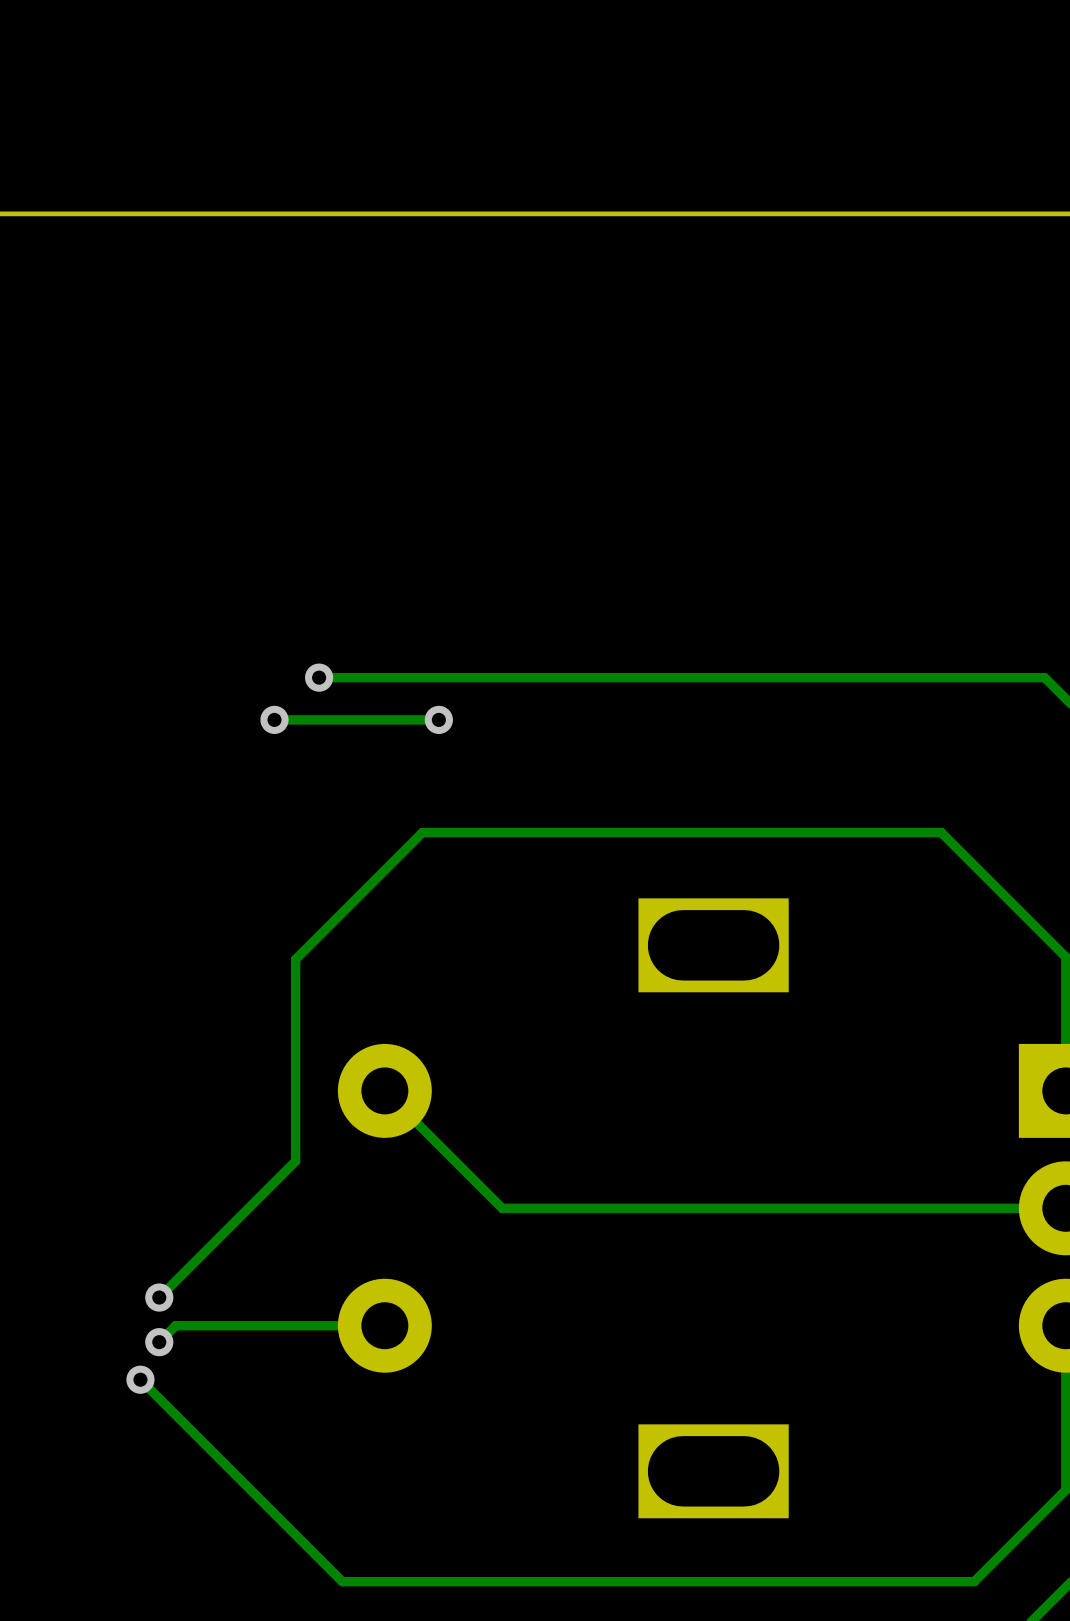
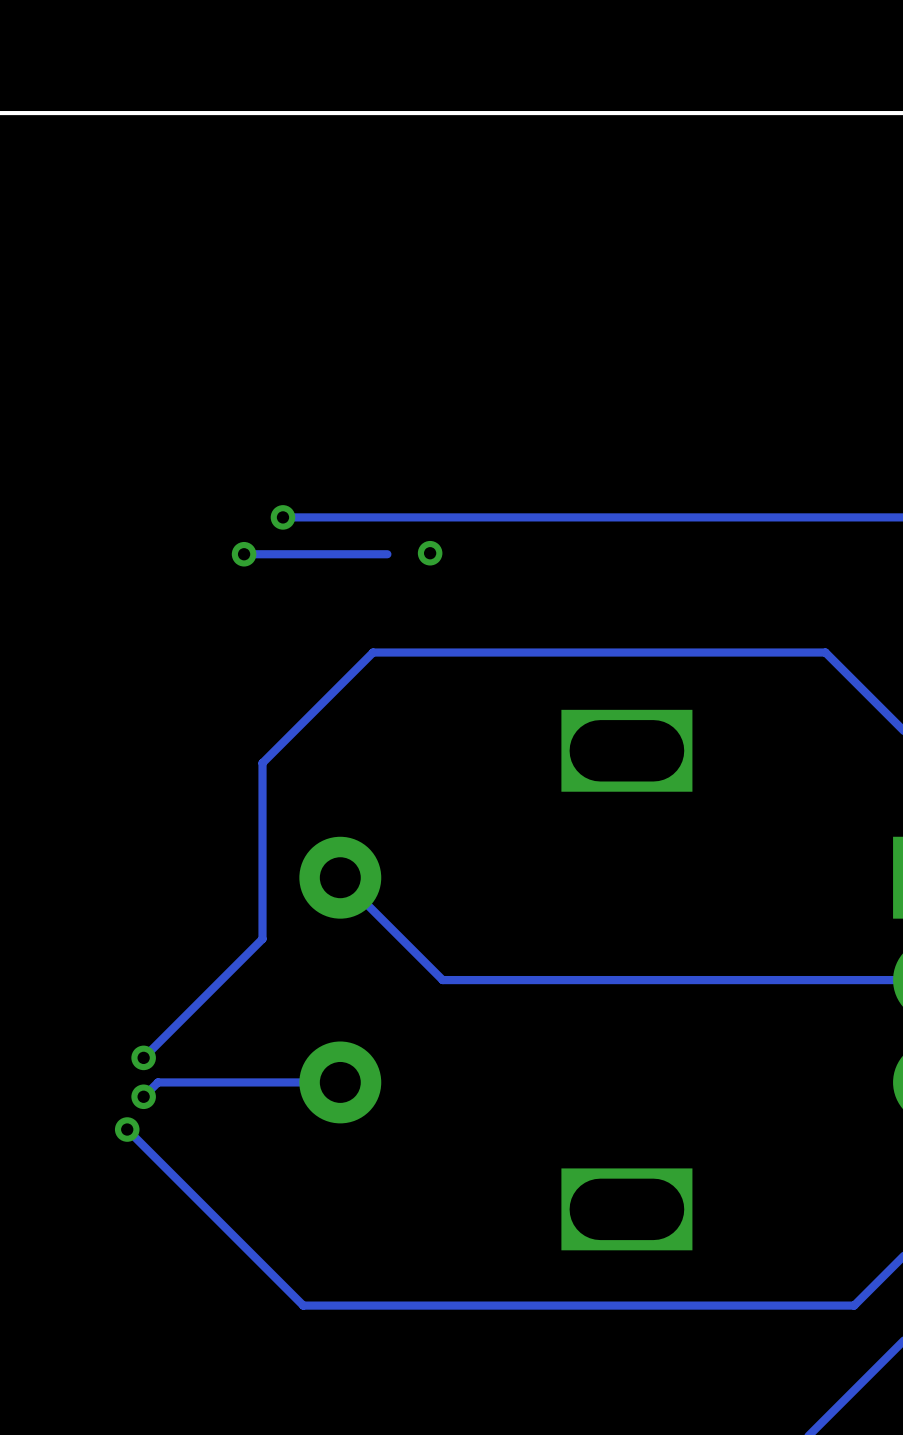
via position: (438, 719) -> (430, 553)

